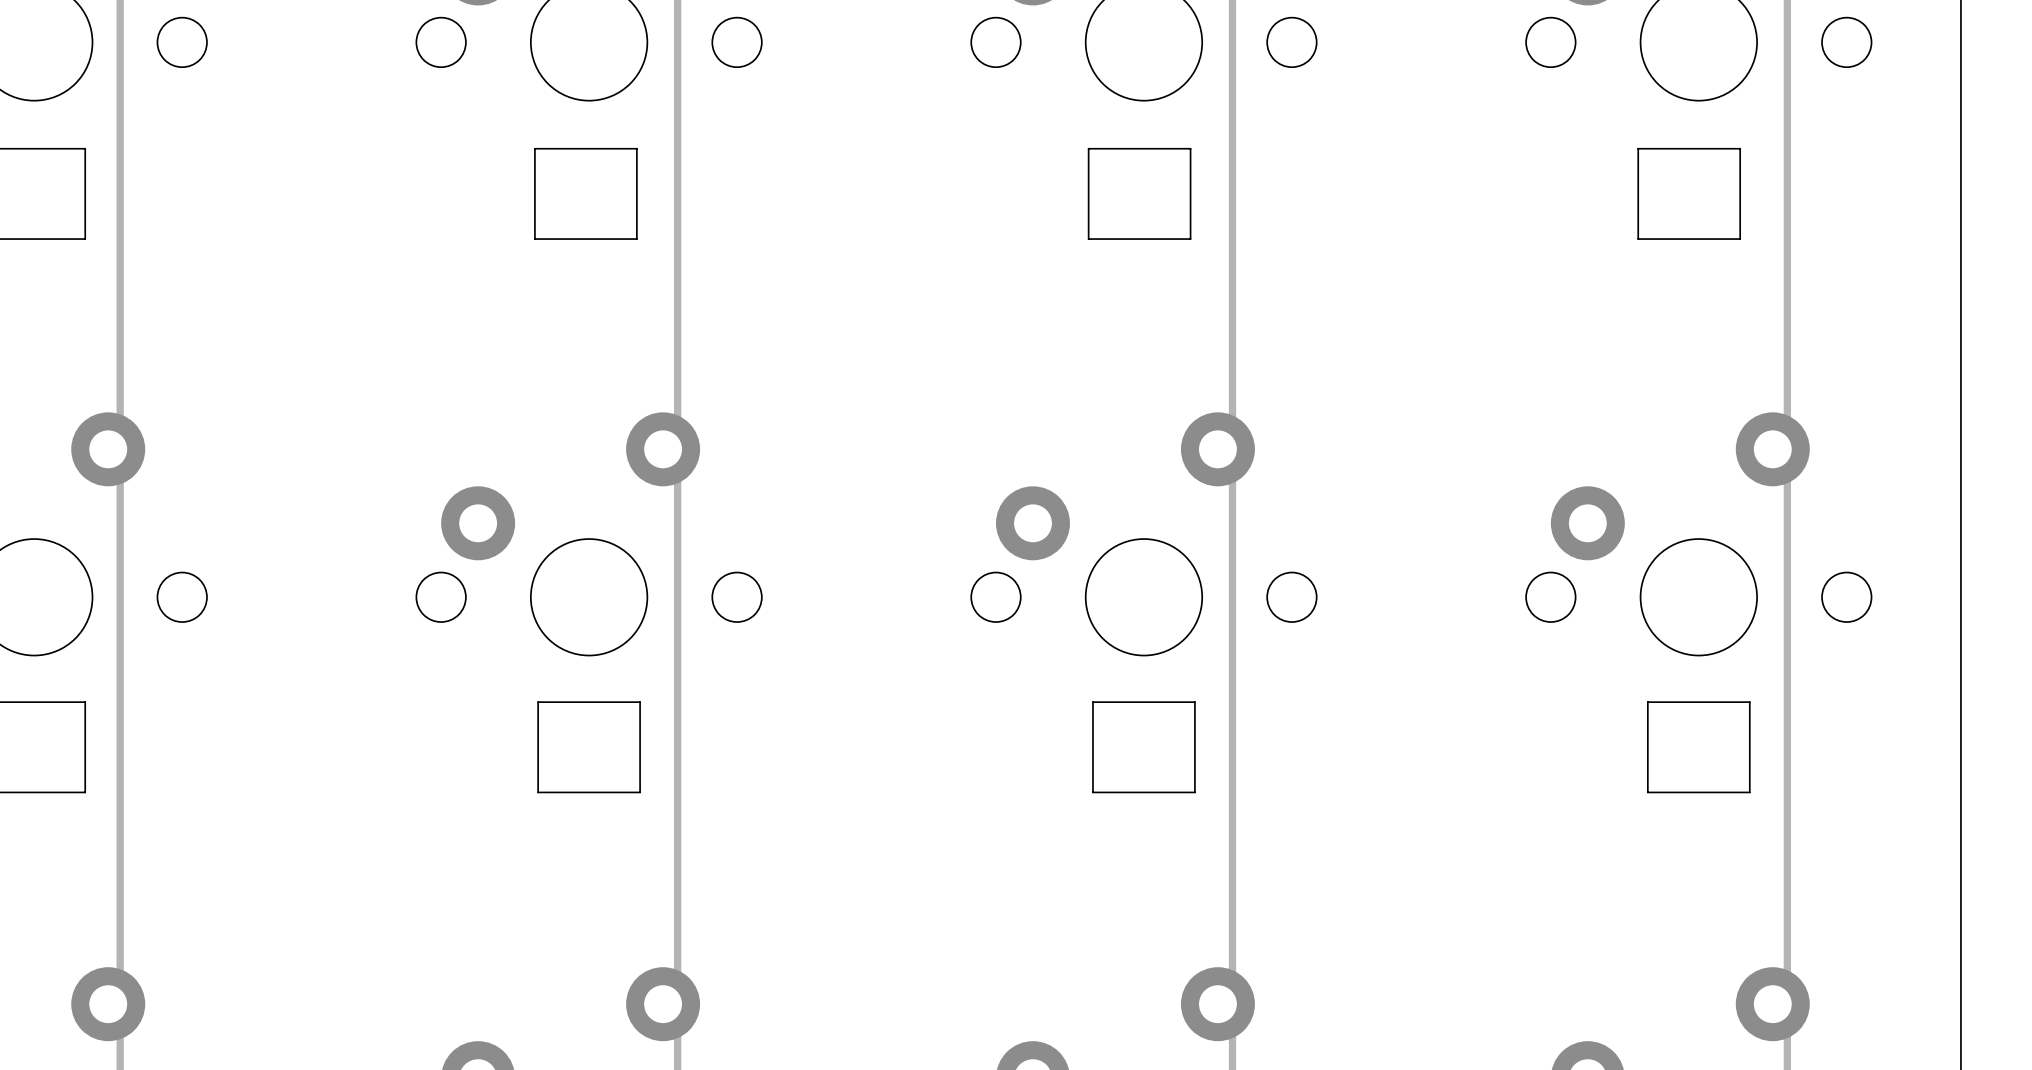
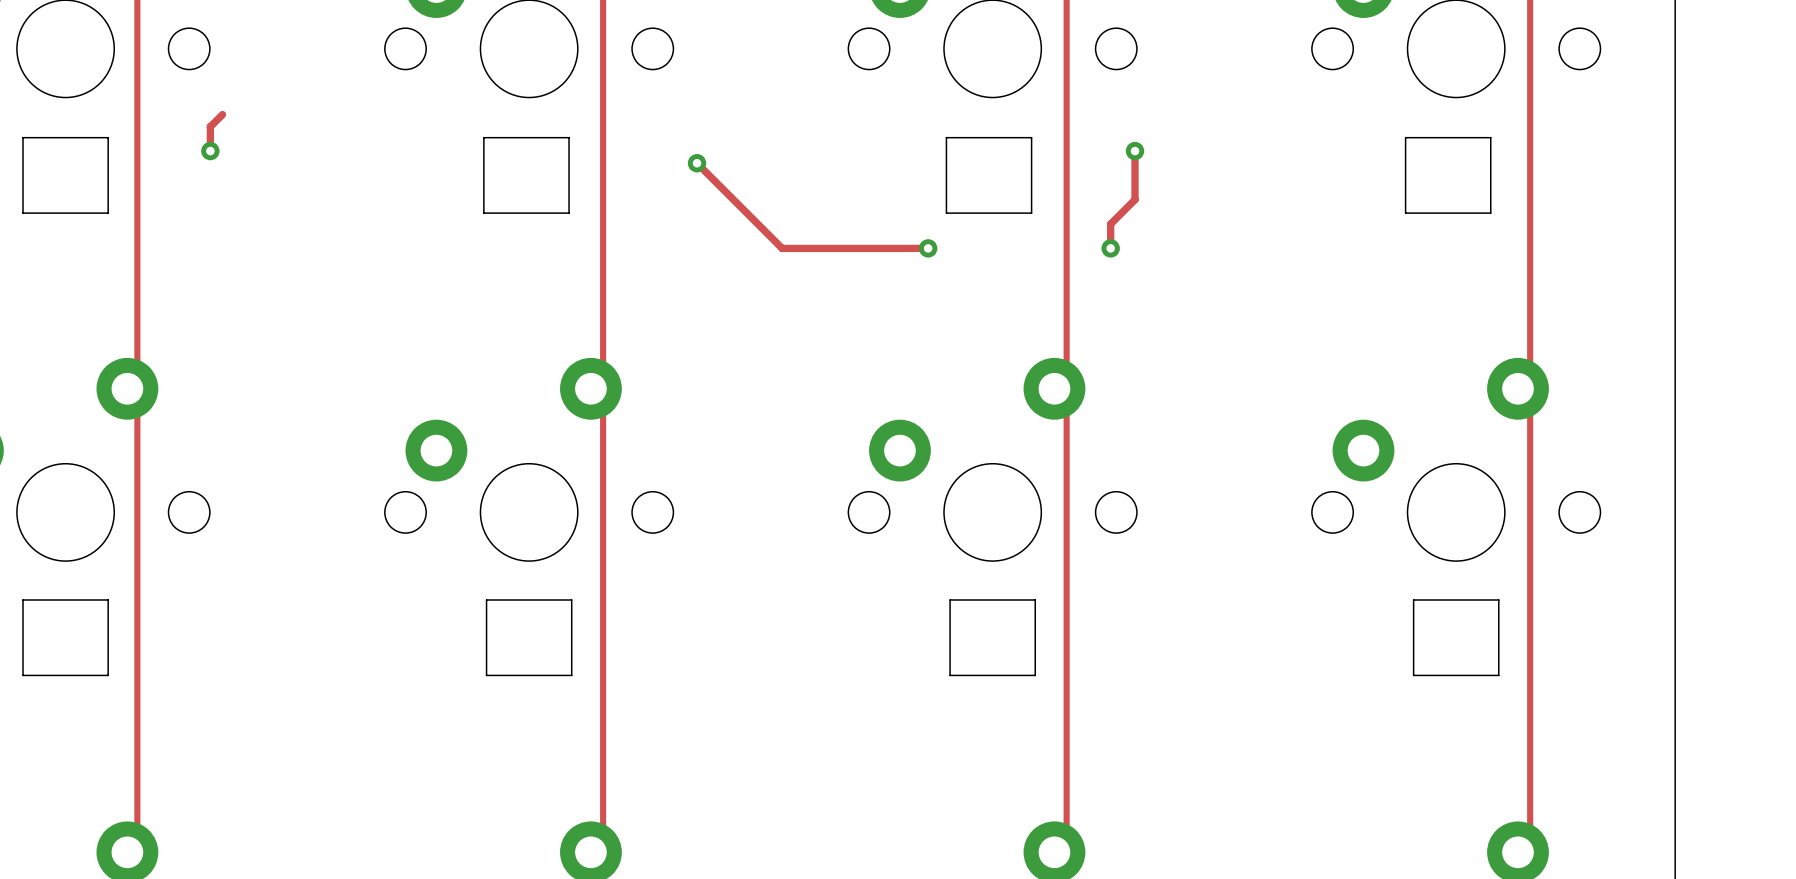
track: none -> (222, 114) (210, 126) (210, 151)
via: none -> (210, 151)
track: none -> (1135, 151) (1135, 199) (1110, 224) (1110, 248)
via: none -> (1135, 151)
track: none -> (697, 163) (782, 248) (928, 248)
via: none -> (697, 163)
via: none -> (928, 248)
via: none -> (1110, 248)

